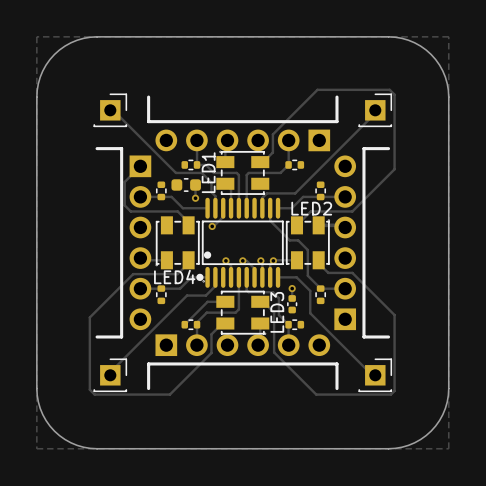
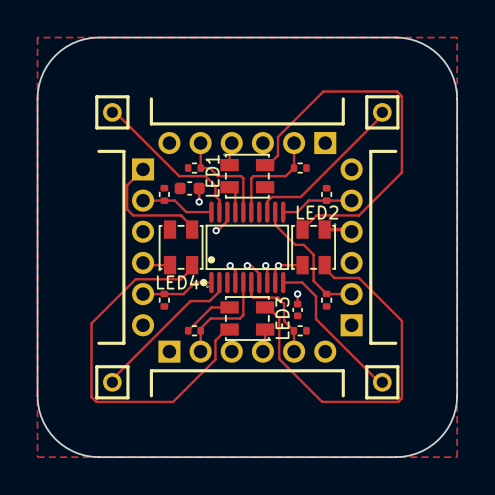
part footprint: [93, 93, 128, 128] -> [95, 95, 130, 130]
part footprint: [358, 93, 393, 128] -> [365, 95, 400, 130]
part footprint: [93, 358, 128, 393] -> [95, 365, 130, 400]
part footprint: [358, 358, 393, 393] -> [365, 365, 400, 400]

